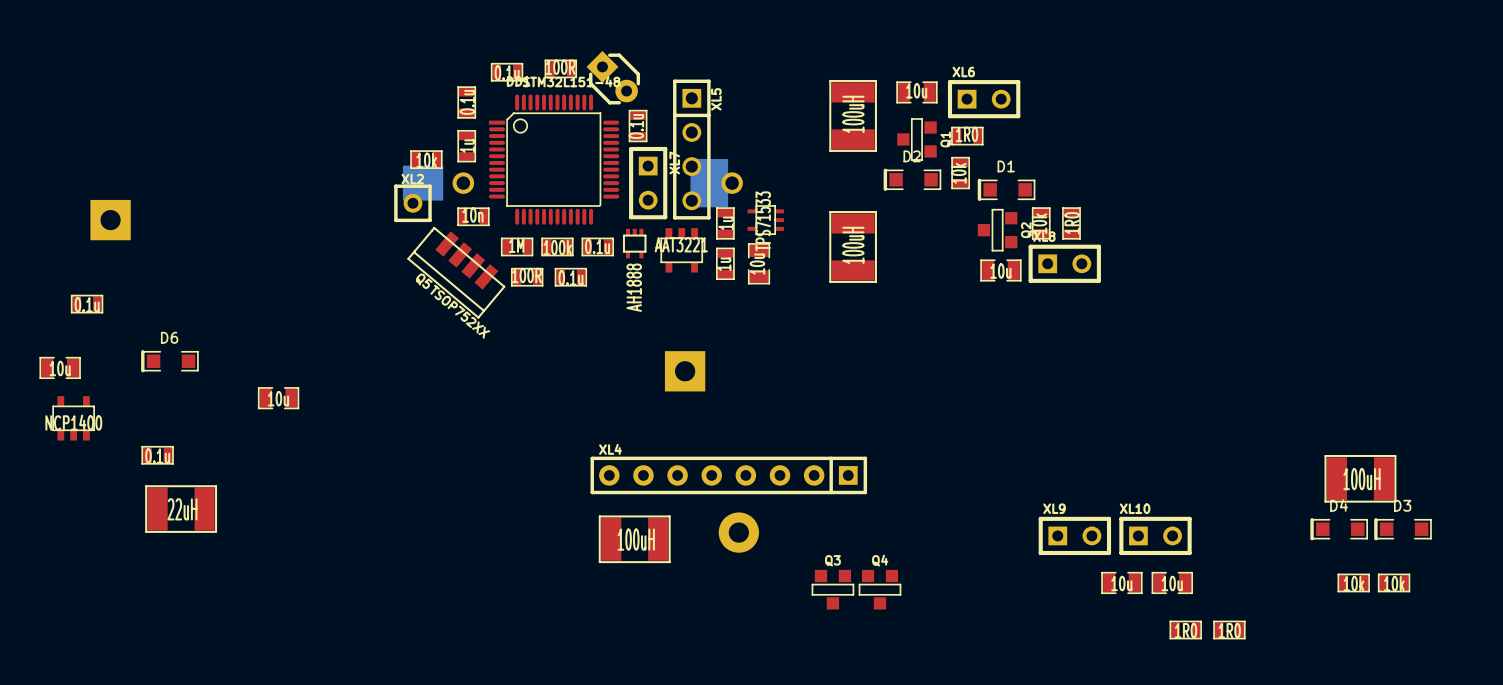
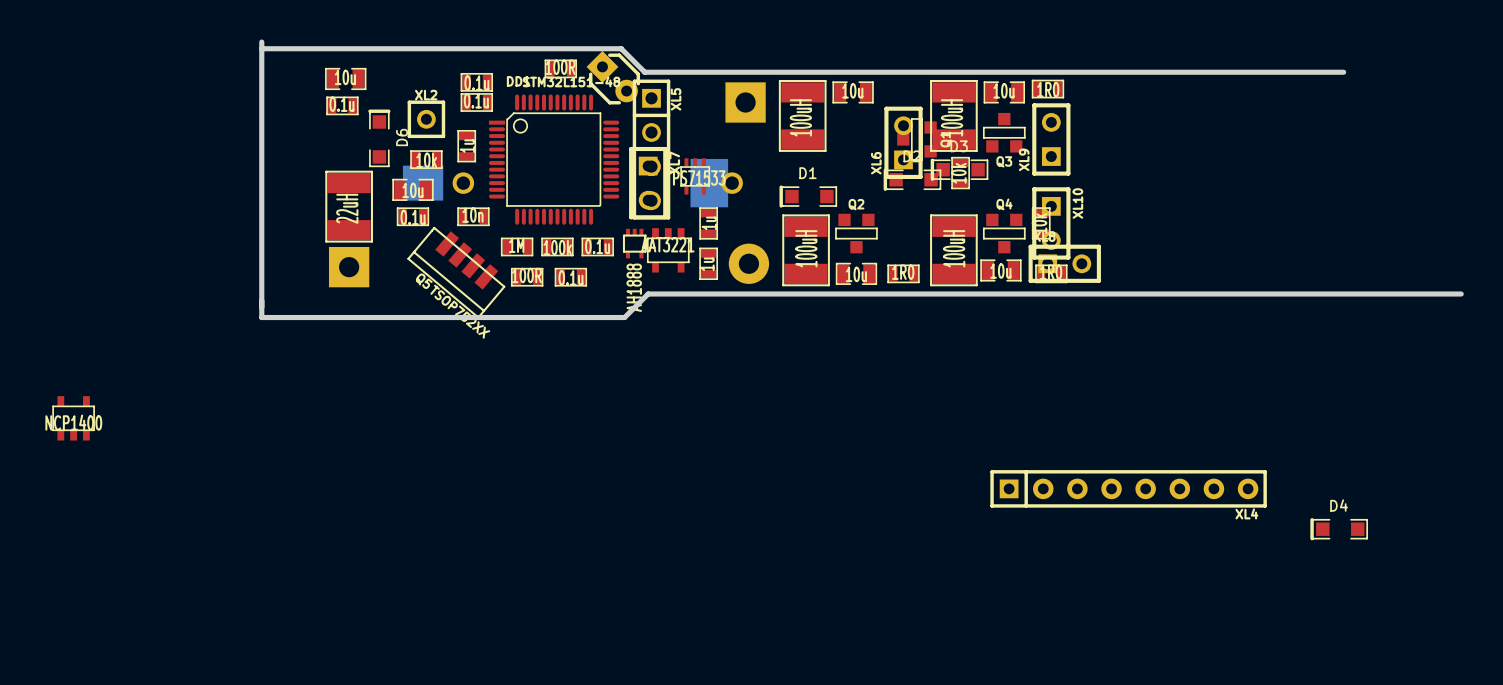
board edge: none -> (261, 42) (261, 317) (624, 317) (648, 294) (1461, 294)
board edge: none -> (261, 48) (621, 48) (644, 72) (1343, 72)
part position: (507, 72) -> (476, 82)
part: none -> 10u (345, 78)
part: none -> 1R0 (1047, 89)
part: none -> 10u (853, 92)
part: 10u (916, 92) -> none
part: none -> 10u (1004, 92)
XL6 rotation: 0° (984, 99) -> 90° counterclockwise (903, 142)
XL6 position: (984, 99) -> (903, 142)
part rotation: 0° (466, 102) -> 90° clockwise (476, 102)
part: none -> (745, 102)
part: none -> 0.1u (342, 105)
part: none -> 100uH (802, 115)
part: 100uH (853, 115) -> none
part: none -> 100uH (953, 115)
part: 0.1u (638, 126) -> none
part: 1R0 (967, 136) -> none
XL5 position: (691, 149) -> (651, 149)
part: none -> 10u (412, 189)
D1 position: (1006, 189) -> (808, 196)
XL2 position: (412, 203) -> (426, 119)
part: none -> 22uH (349, 206)
part: none -> 0.1u (412, 216)
part: (110, 220) -> none
part rotation: 0° (765, 220) -> 90° counterclockwise (695, 176)
part position: (765, 220) -> (695, 176)
part position: (725, 223) -> (708, 223)
part rotation: 0° (1071, 223) -> 90° clockwise (1051, 273)
part position: (1071, 223) -> (1051, 273)
Q2 rotation: 0° (997, 230) -> 90° counterclockwise (856, 233)
Q2 position: (997, 230) -> (856, 233)
part footprint: [747, 243, 771, 285] -> [728, 243, 770, 284]
part position: (853, 246) -> (806, 250)
part position: (681, 250) -> (668, 250)
part: none -> 100uH (953, 250)
part position: (725, 263) -> (708, 263)
part value: 10u (757, 264) -> none
part: none -> (349, 267)
part: none -> 10u (856, 273)
part: none -> 1R0 (903, 273)
part: 0.1u (87, 304) -> none
D6 rotation: 0° (169, 361) -> 90° clockwise (379, 138)
D6 position: (169, 361) -> (379, 138)
part: 10u (60, 367) -> none
part: (685, 371) -> none
part: 10u (278, 398) -> none
part: 0.1u (157, 455) -> none
XL4 rotation: 0° (728, 475) -> 180° (1128, 488)
XL4 position: (728, 475) -> (1128, 488)
part: 100uH (1360, 478) -> none
part: 22uH (181, 509) -> none
D3 position: (1403, 529) -> (959, 169)
part: (738, 532) -> none
XL9 rotation: 0° (1074, 535) -> 90° counterclockwise (1051, 139)
XL9 position: (1074, 535) -> (1051, 139)
XL10 rotation: 0° (1155, 535) -> 90° clockwise (1051, 223)
XL10 position: (1155, 535) -> (1051, 223)
part: 100uH (634, 539) -> none
part: 10u (1121, 582) -> none
part: 10u (1172, 582) -> none
part: 10k (1353, 582) -> none
part: 10k (1394, 582) -> none
Q3 rotation: 0° (832, 589) -> 180° (1004, 132)
Q3 position: (832, 589) -> (1004, 132)
Q4 position: (879, 589) -> (1004, 233)
part: 1R0 (1185, 630) -> none
part: 1R0 (1229, 630) -> none

